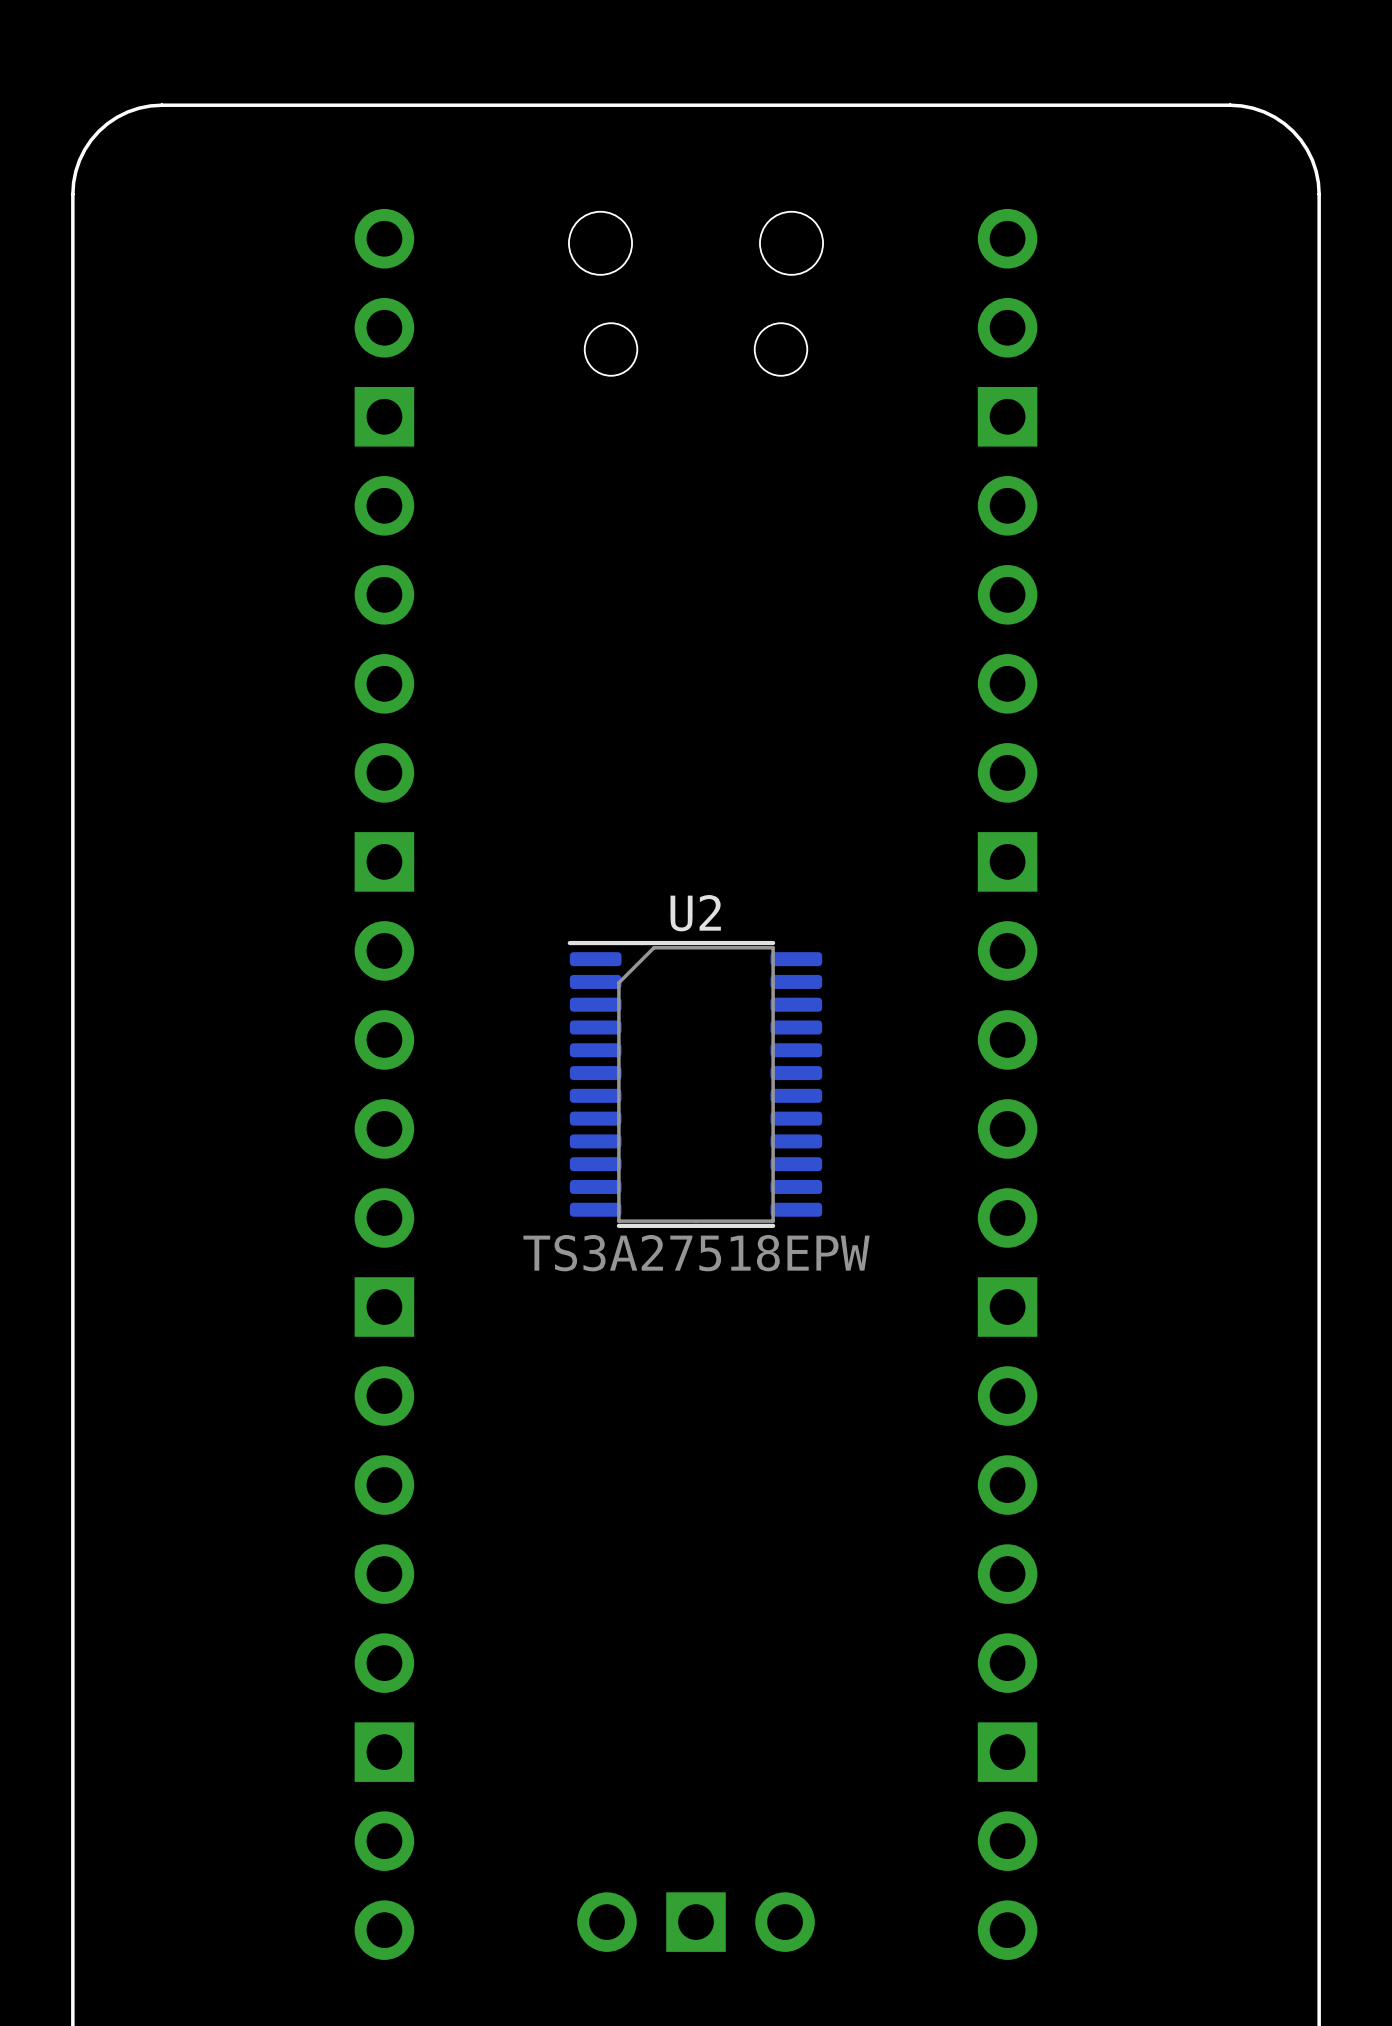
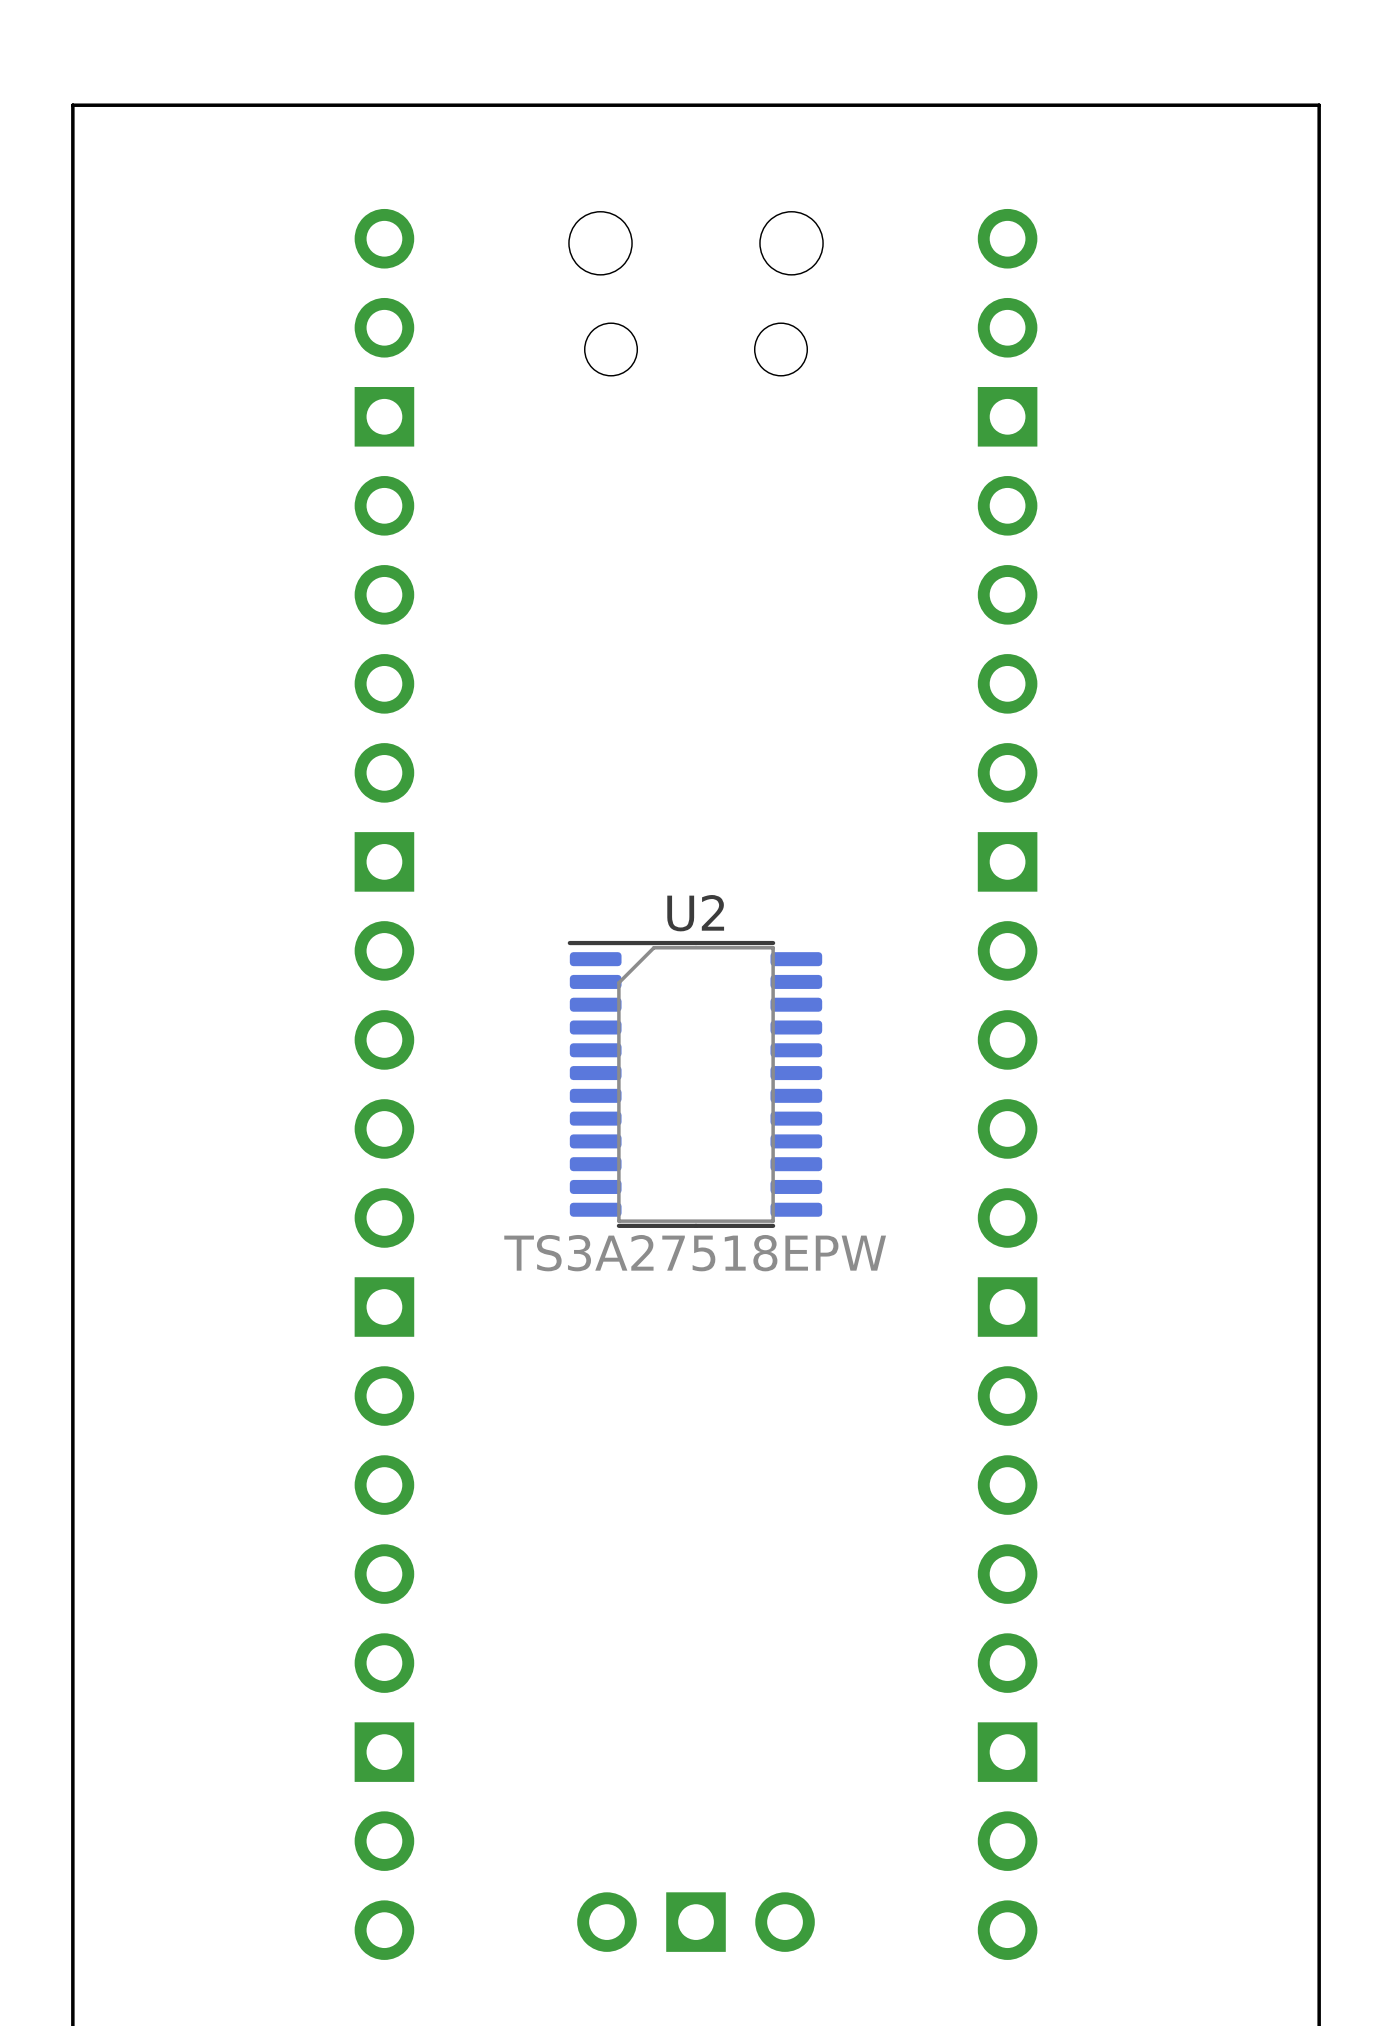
board edge: (161, 105) (150, 105) (127, 111) (117, 117) (98, 131) (91, 140) (79, 160) (73, 182) (72, 194) -> (161, 105) (72, 105) (72, 194)
board edge: (1230, 105) (1241, 105) (1264, 111) (1274, 117) (1293, 131) (1307, 149) (1312, 160) (1318, 182) (1319, 194) -> (1230, 105) (1319, 105) (1319, 194)

